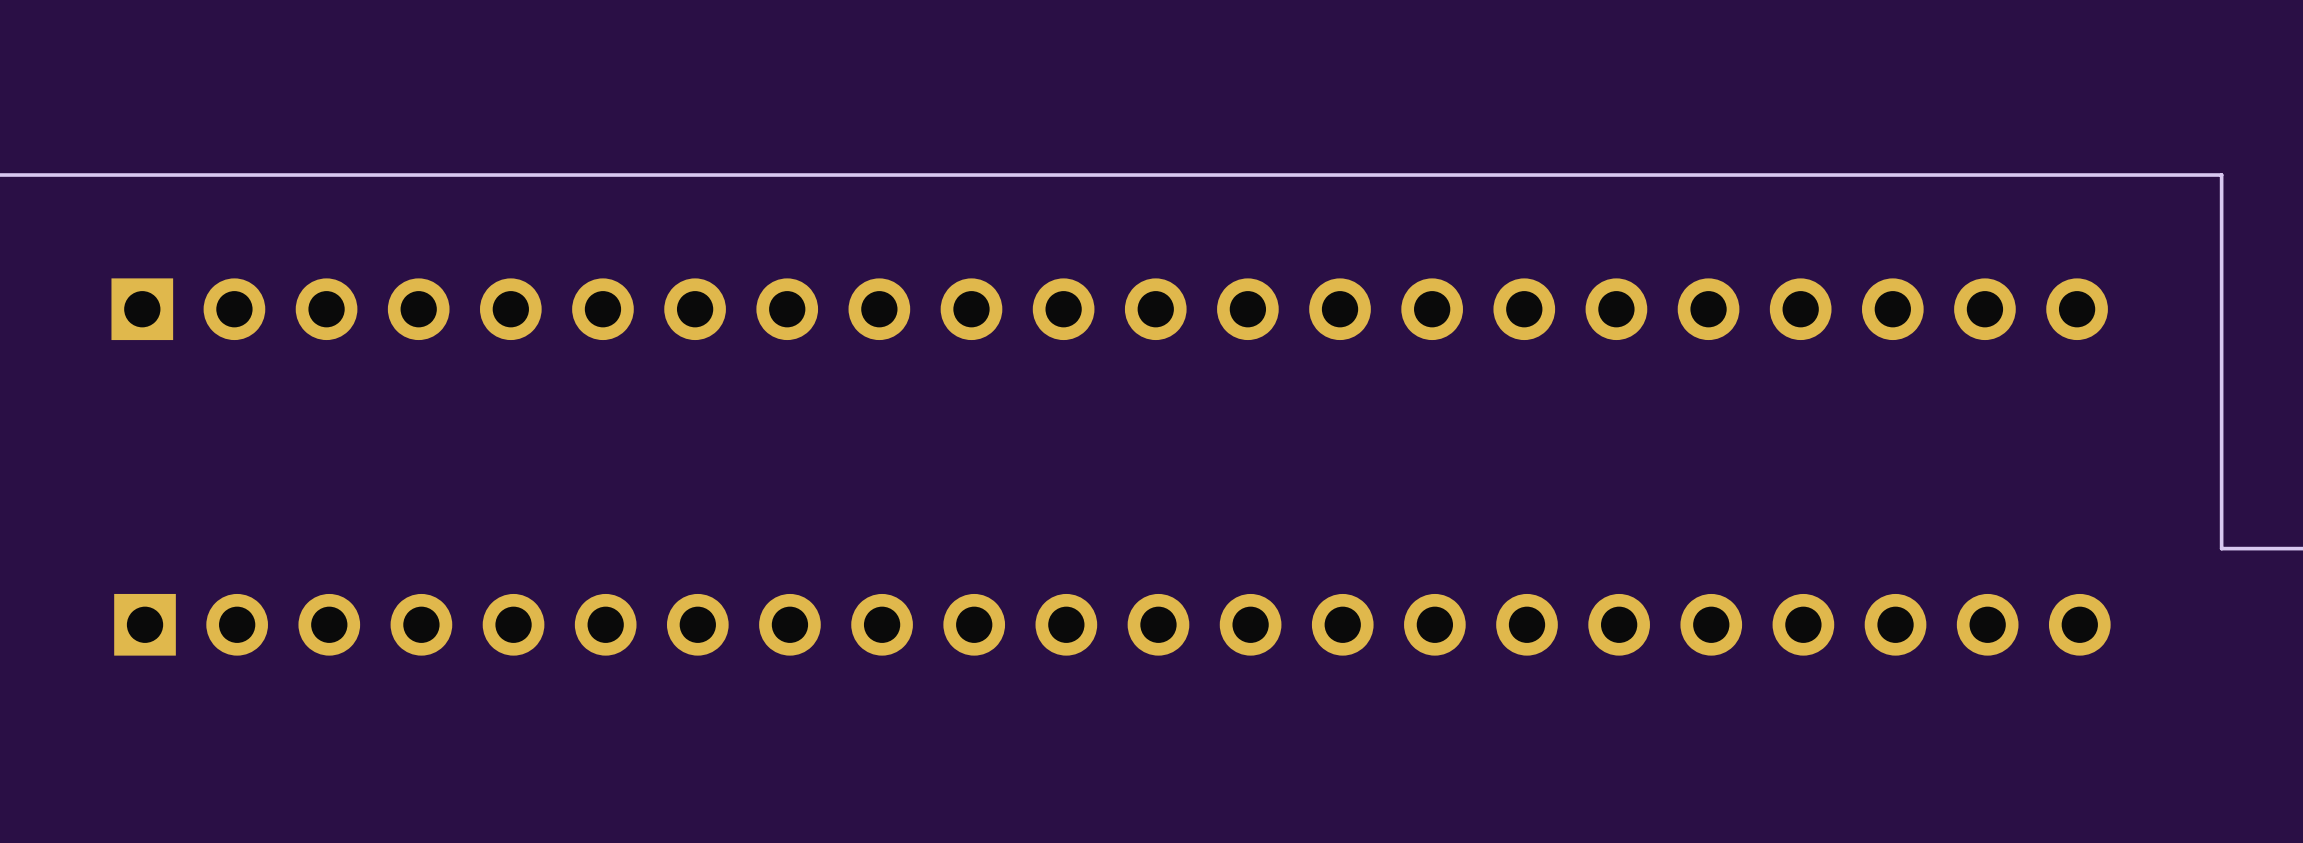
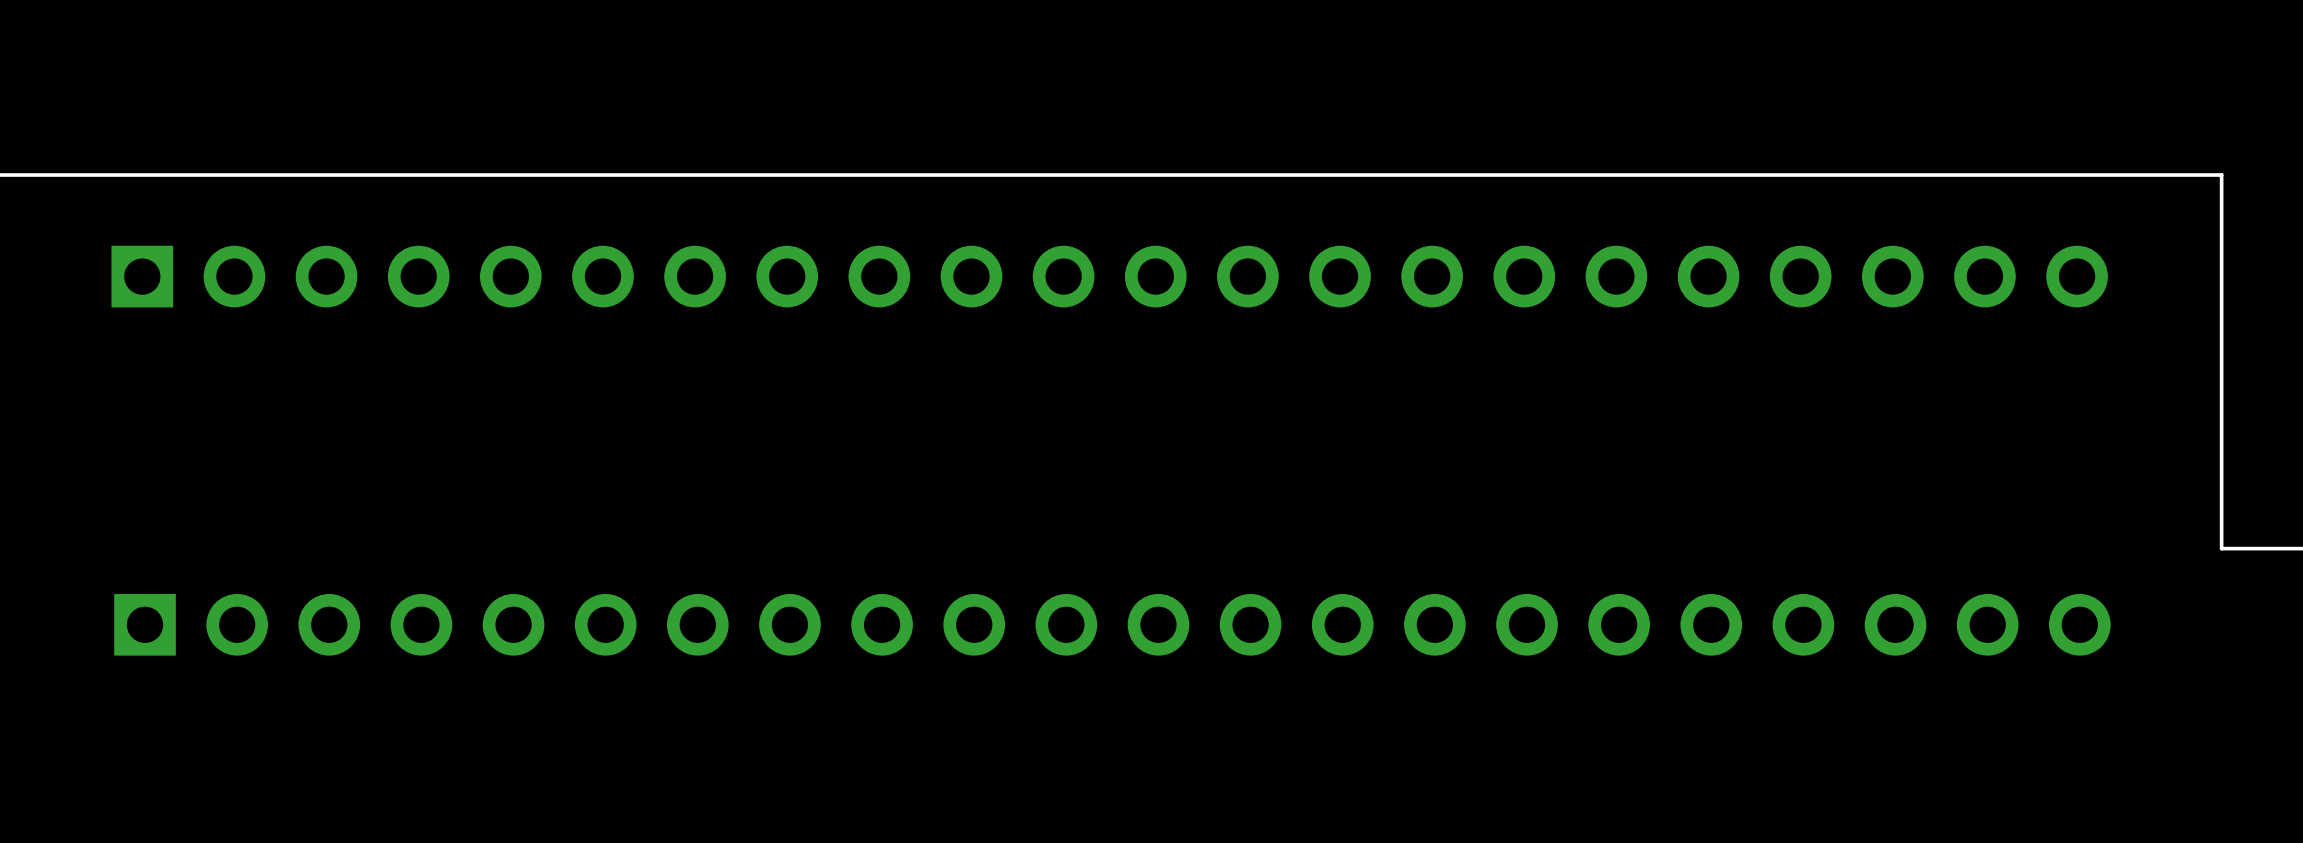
part position: (1109, 309) -> (1109, 276)

